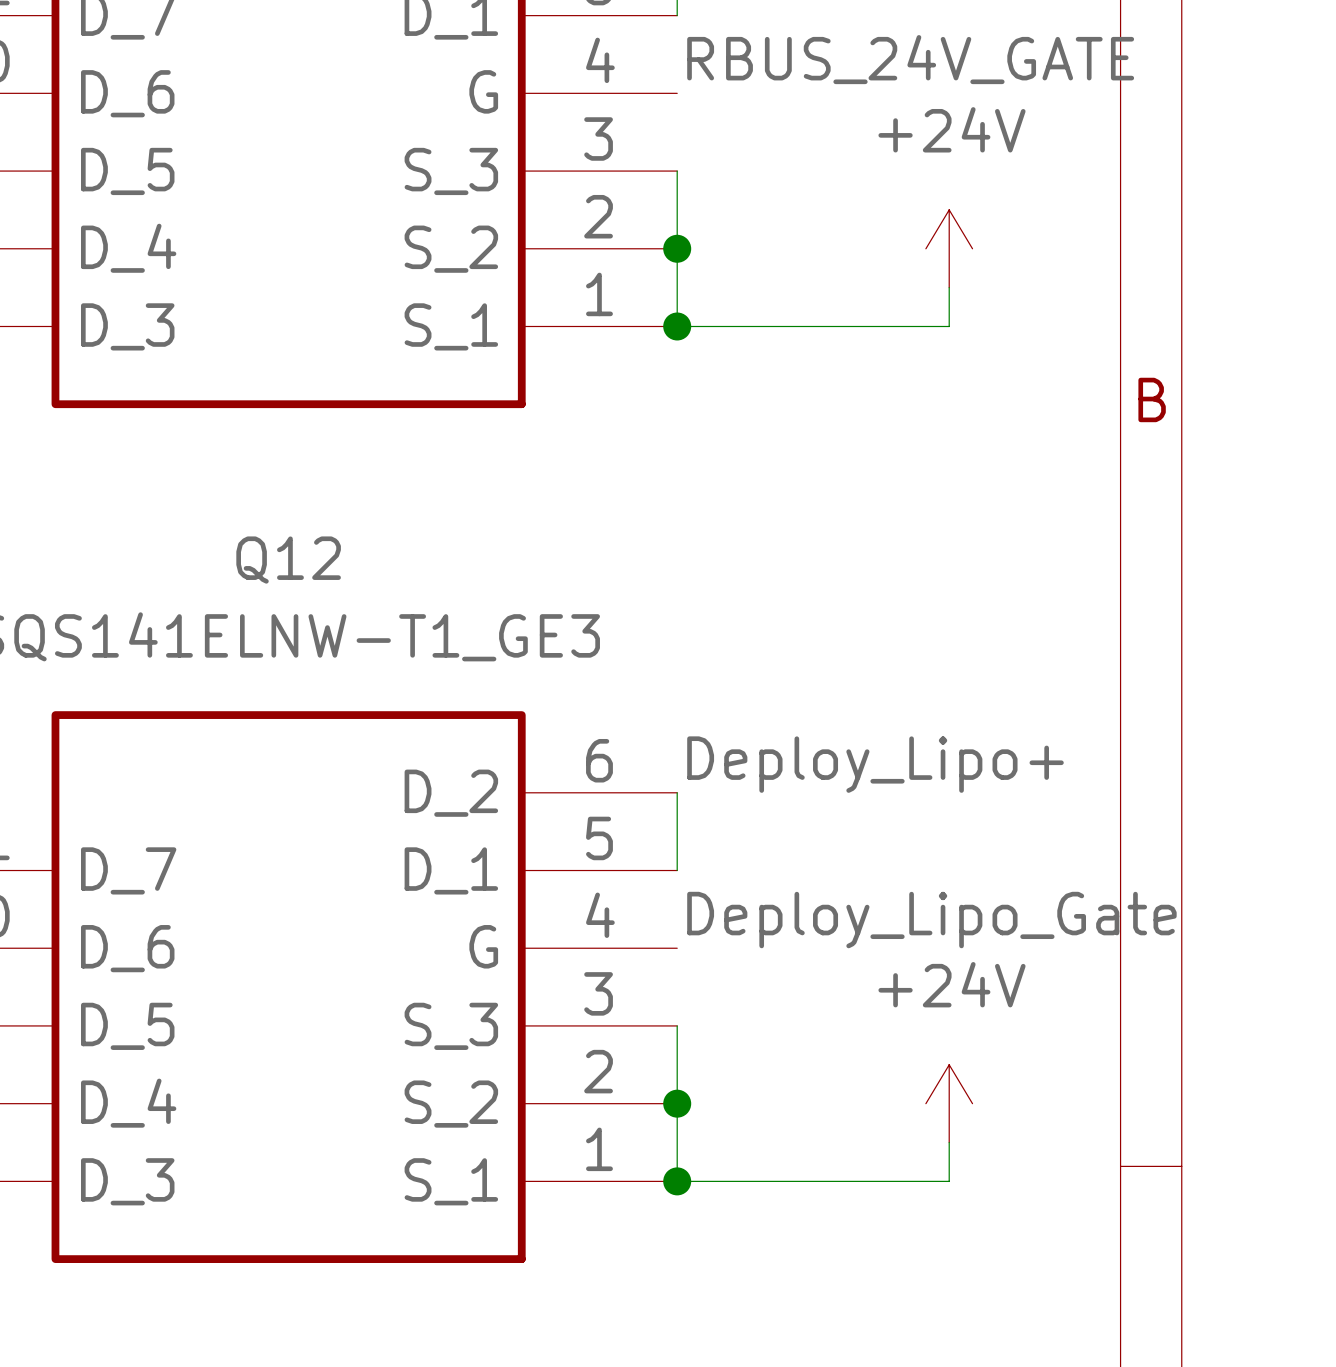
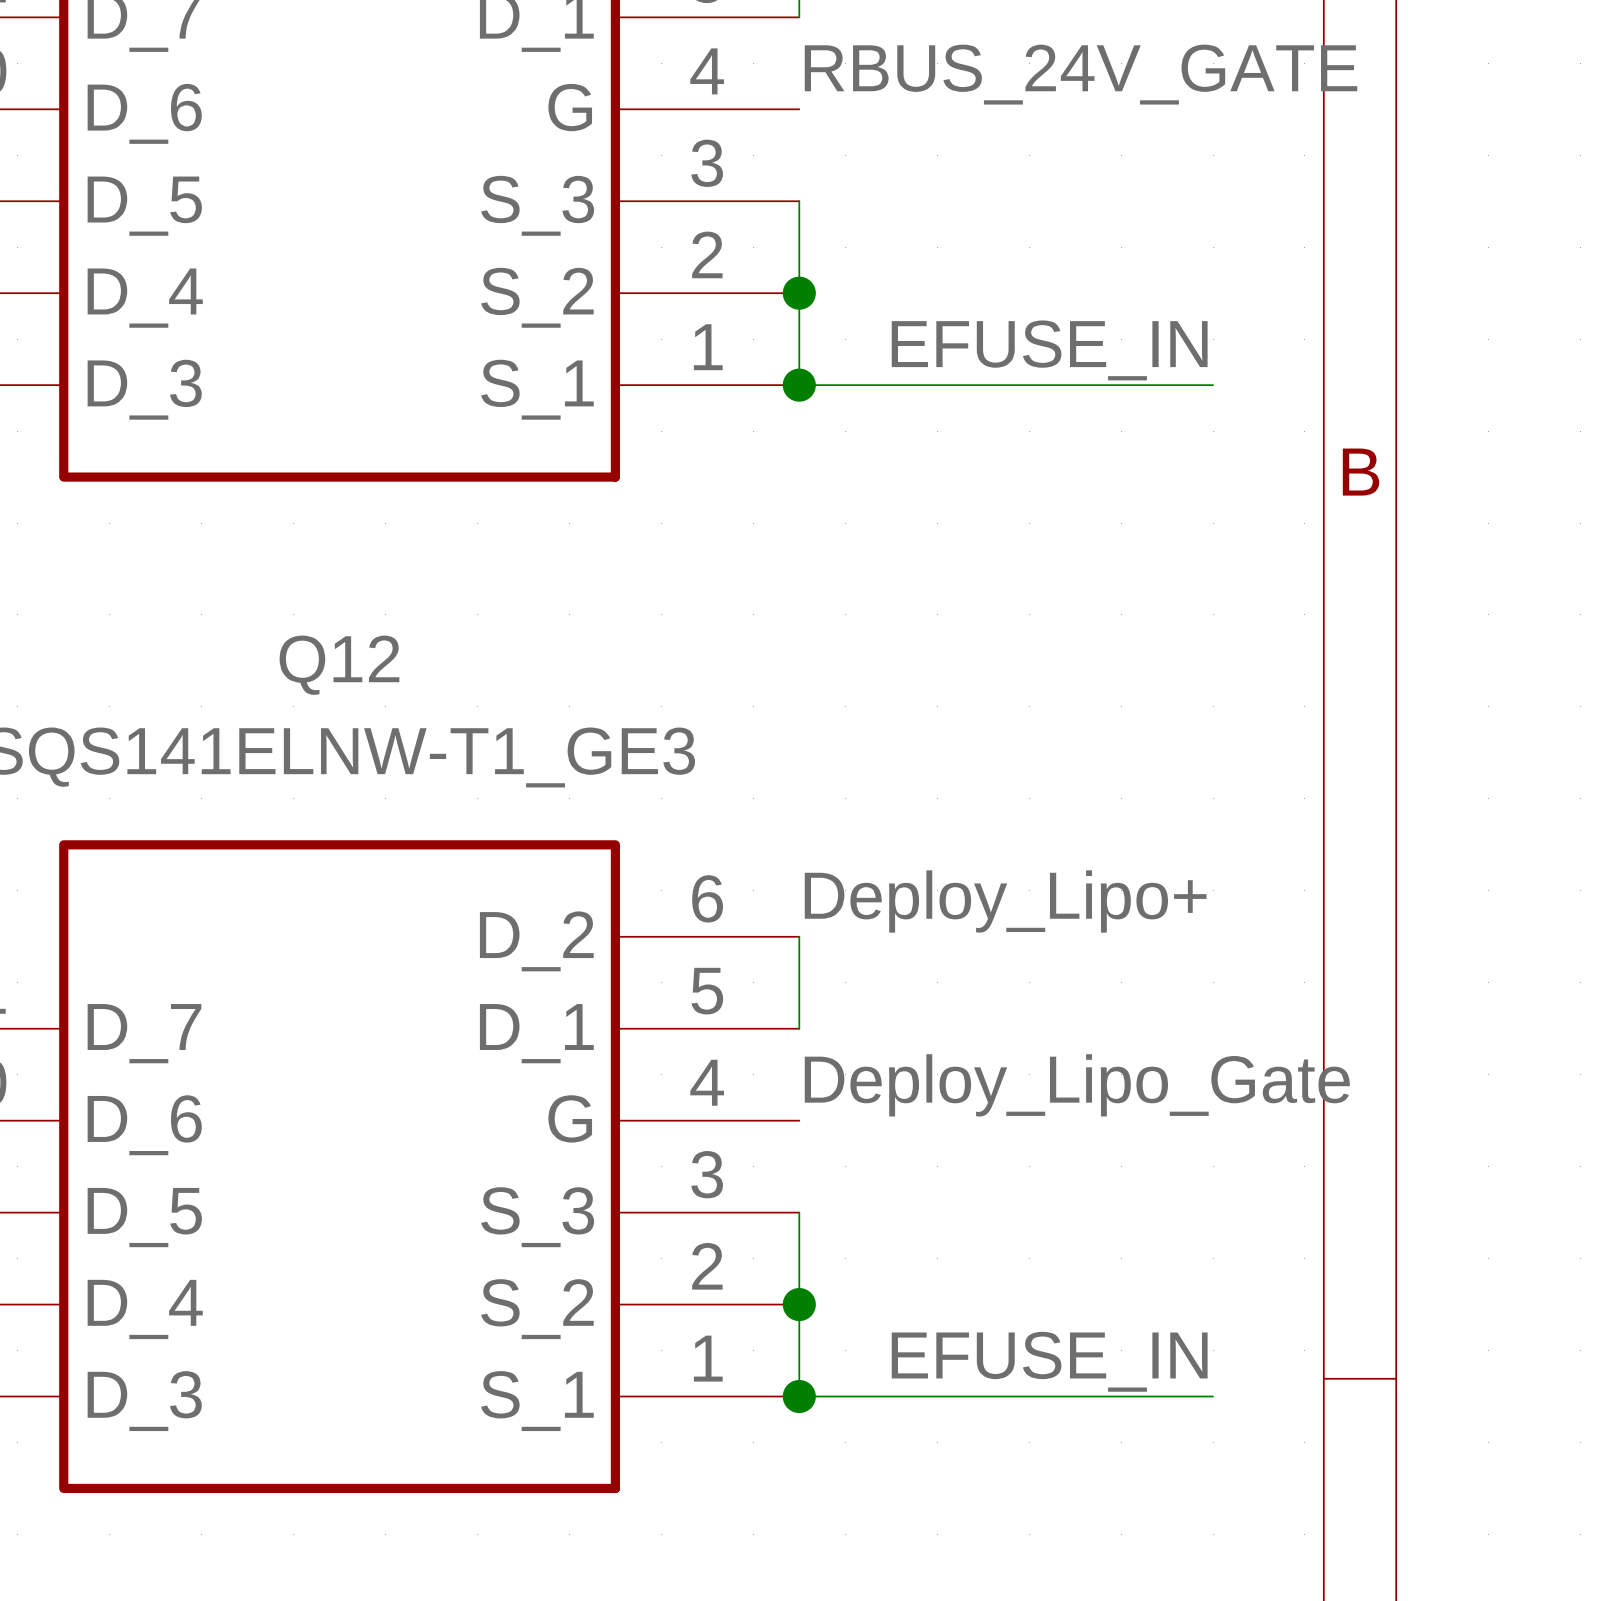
power symbol: +24V (949, 248) -> none
wire: (949, 287) (949, 326) -> (1213, 385) (1121, 385)
label: none -> EFUSE_IN (1049, 350)
power symbol: +24V (949, 1103) -> none
wire: (949, 1142) (949, 1181) -> (1213, 1396) (1121, 1396)
label: none -> EFUSE_IN (1049, 1361)

